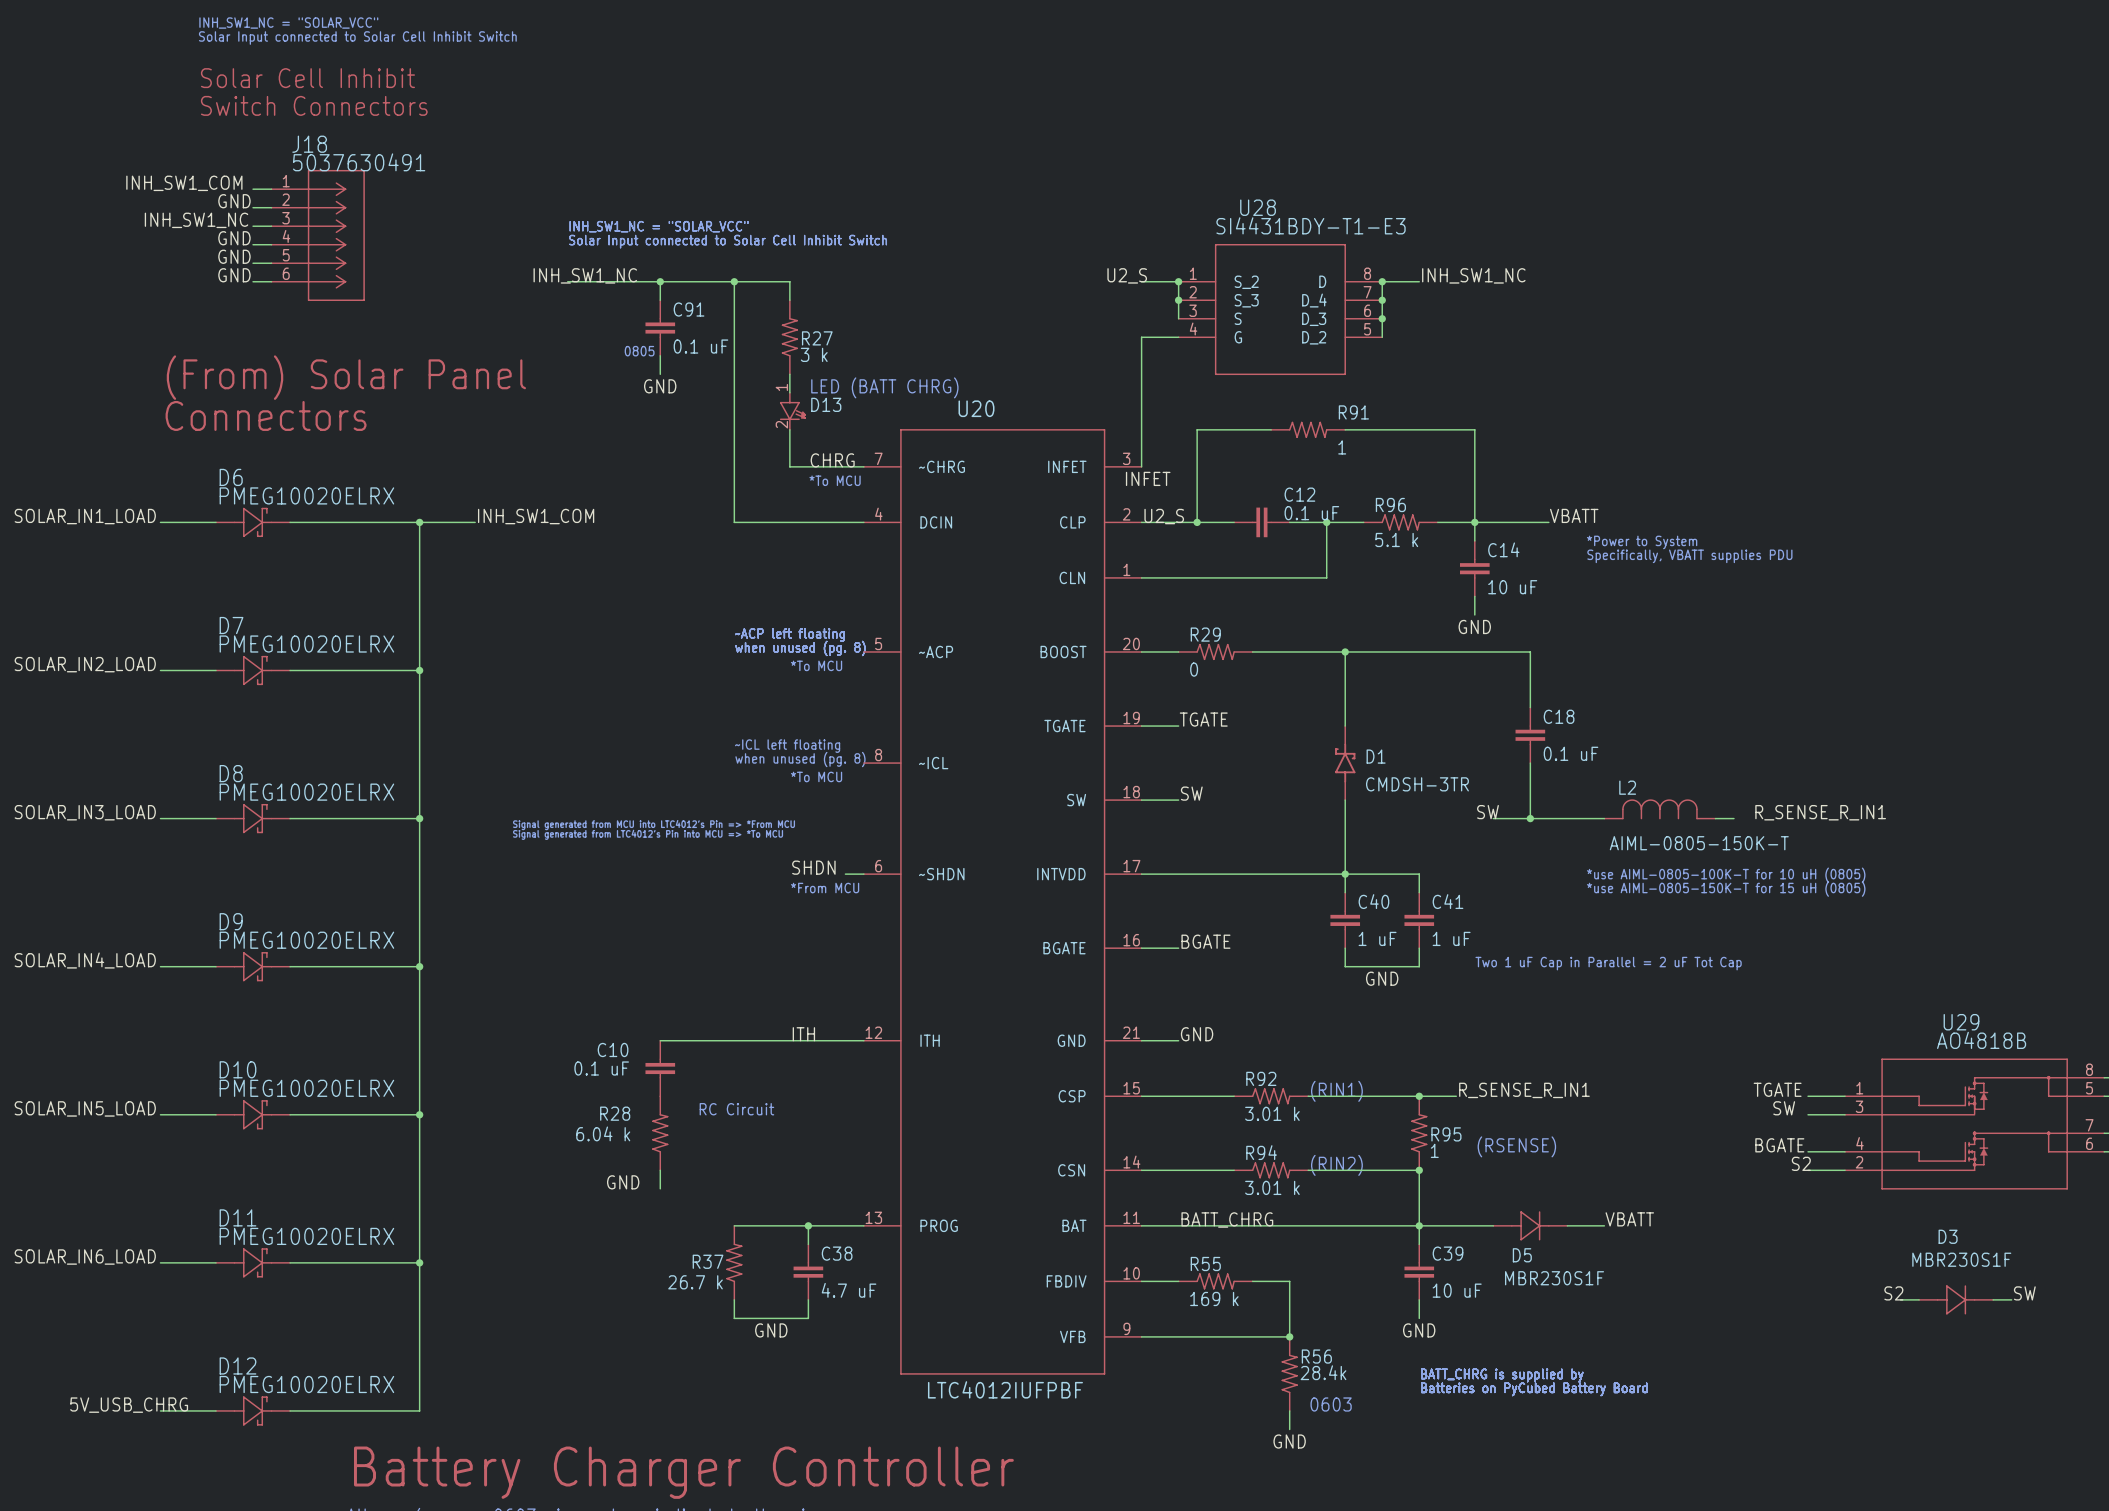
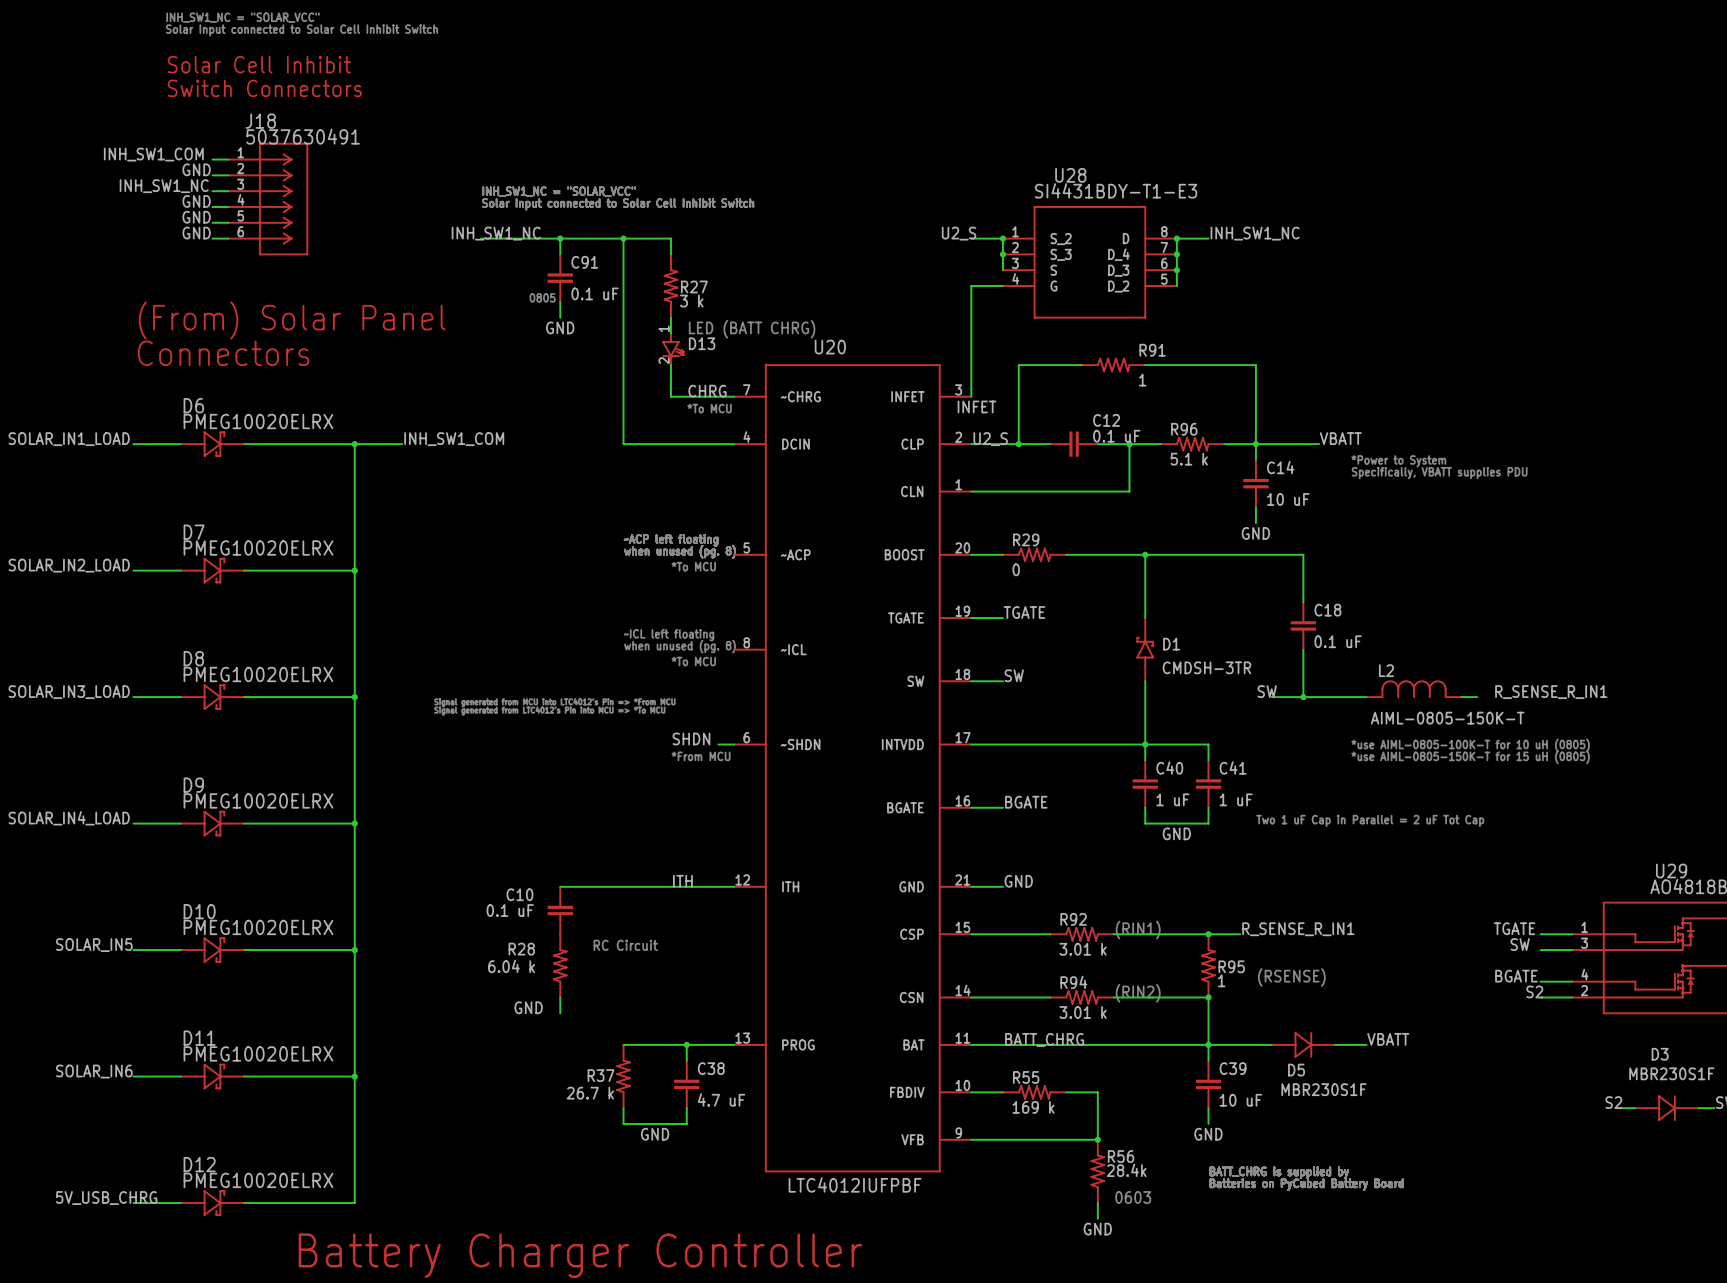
label: SOLAR_IN5_LOAD (85, 1108) -> SOLAR_IN5 (94, 945)
label: SOLAR_IN6_LOAD (85, 1257) -> SOLAR_IN6 (94, 1071)

